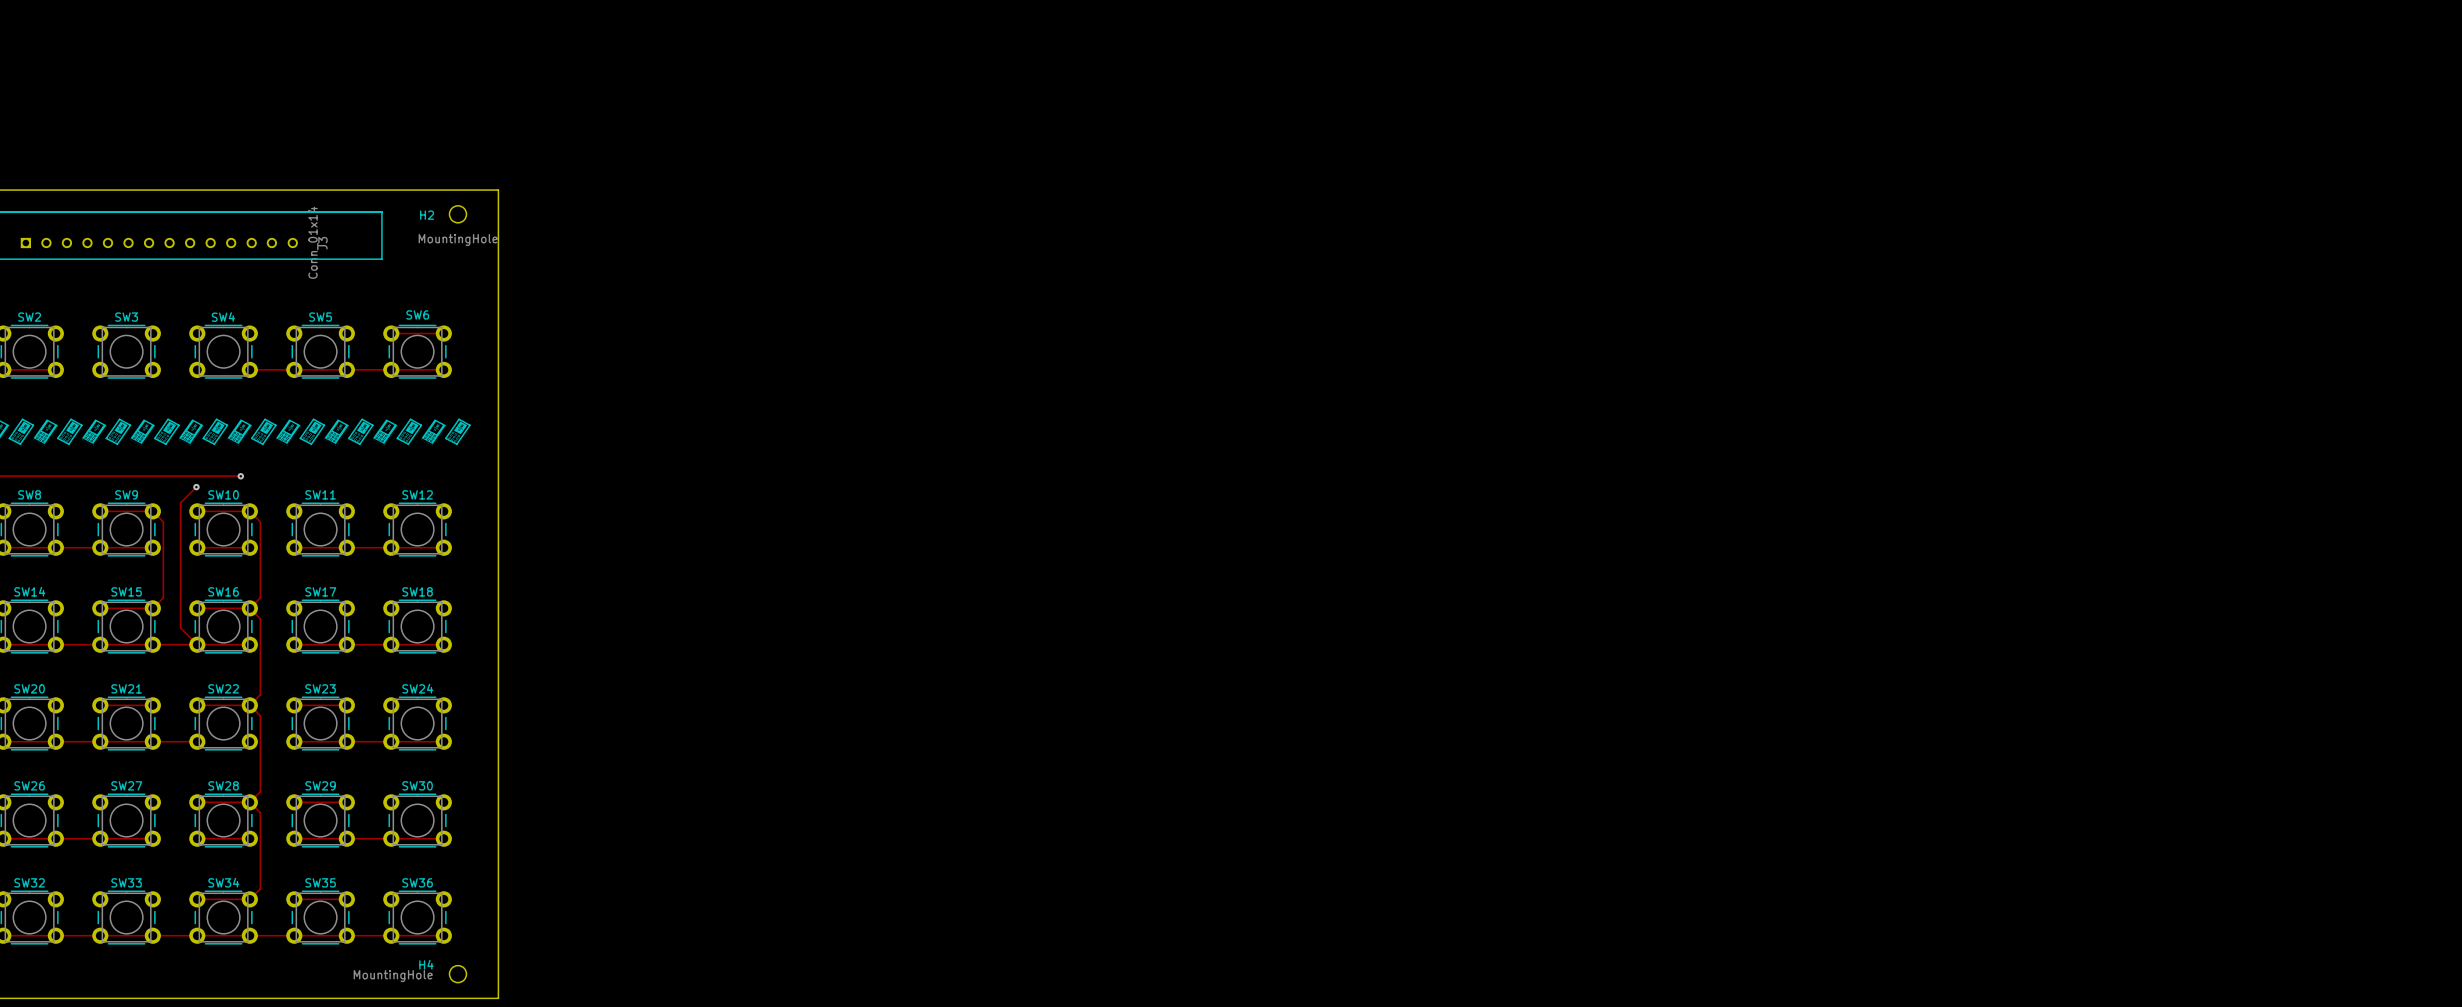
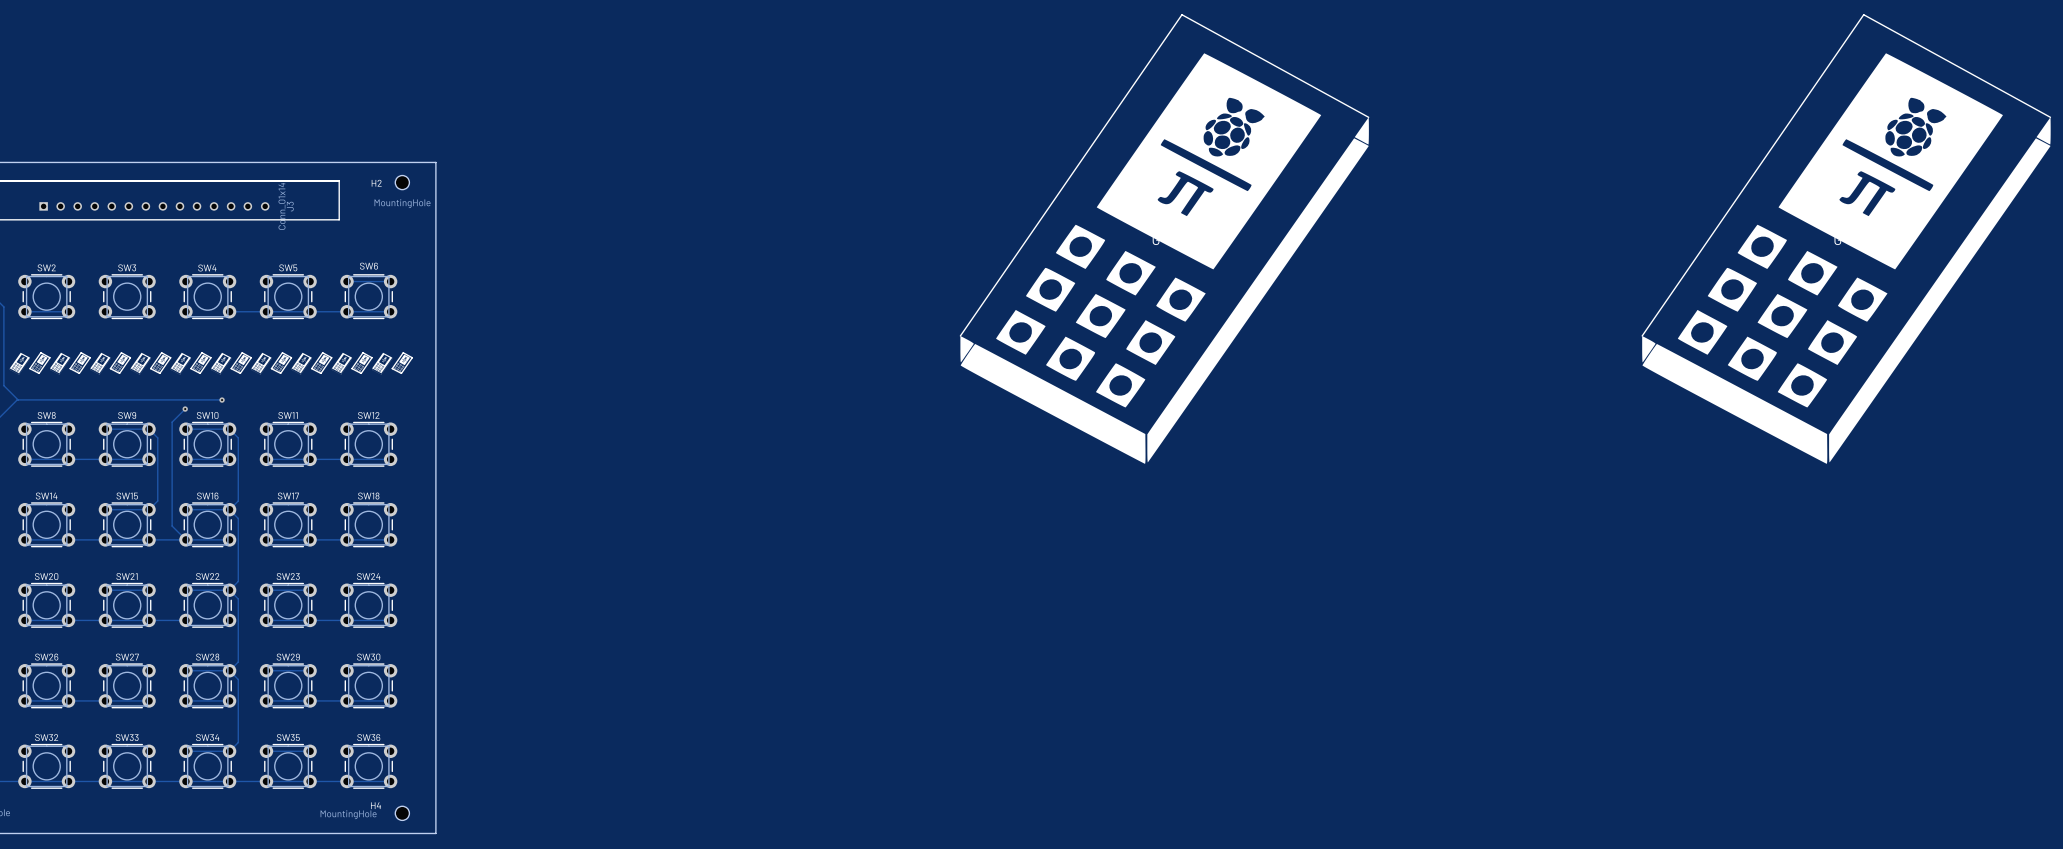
part: none -> (1164, 239)
part: none -> (1846, 239)

